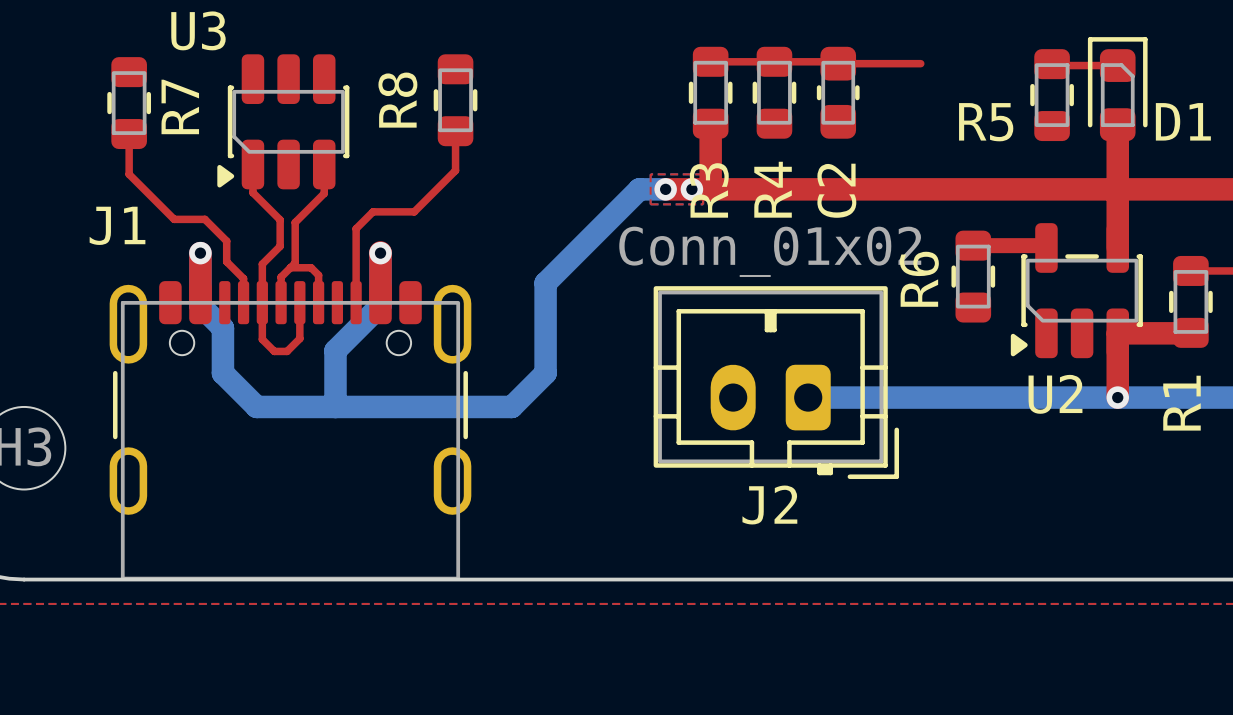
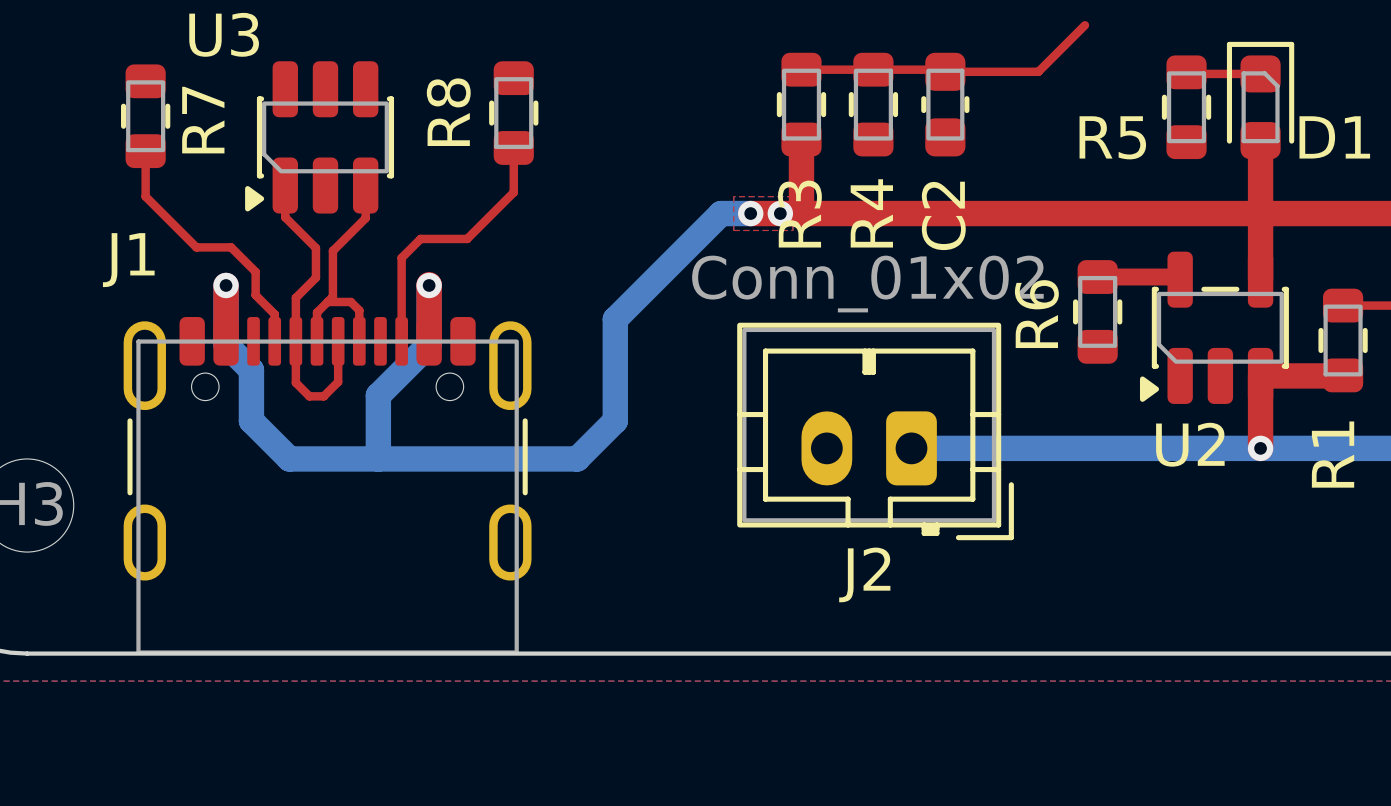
top track: none -> (1084, 25) (1038, 71)

